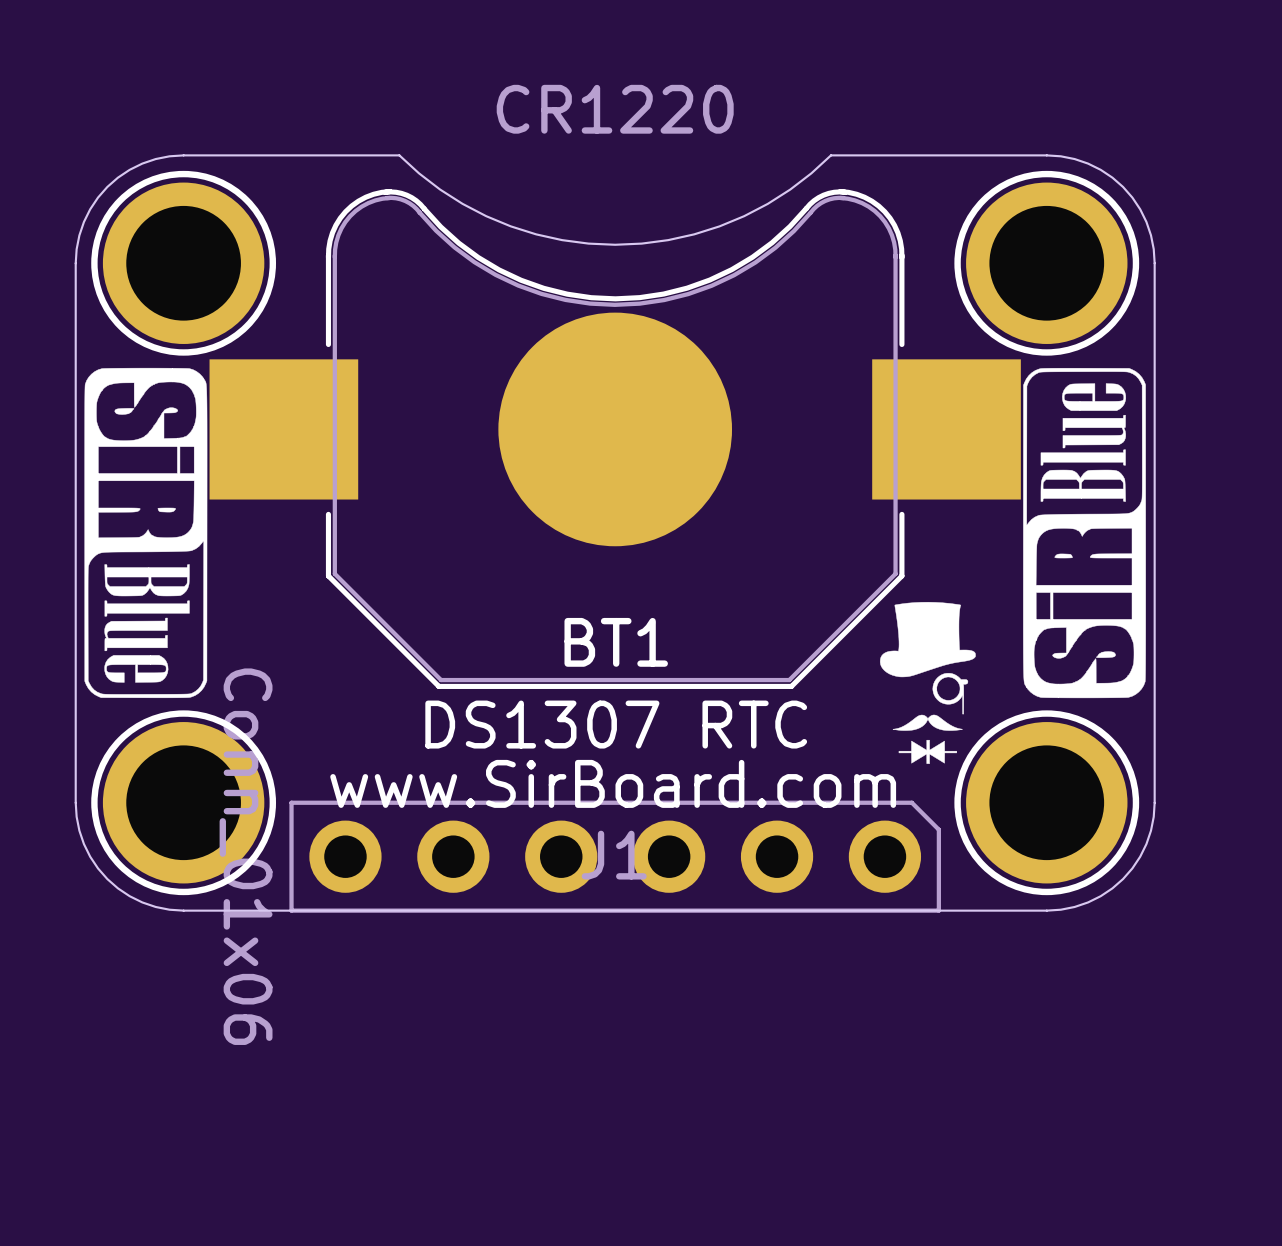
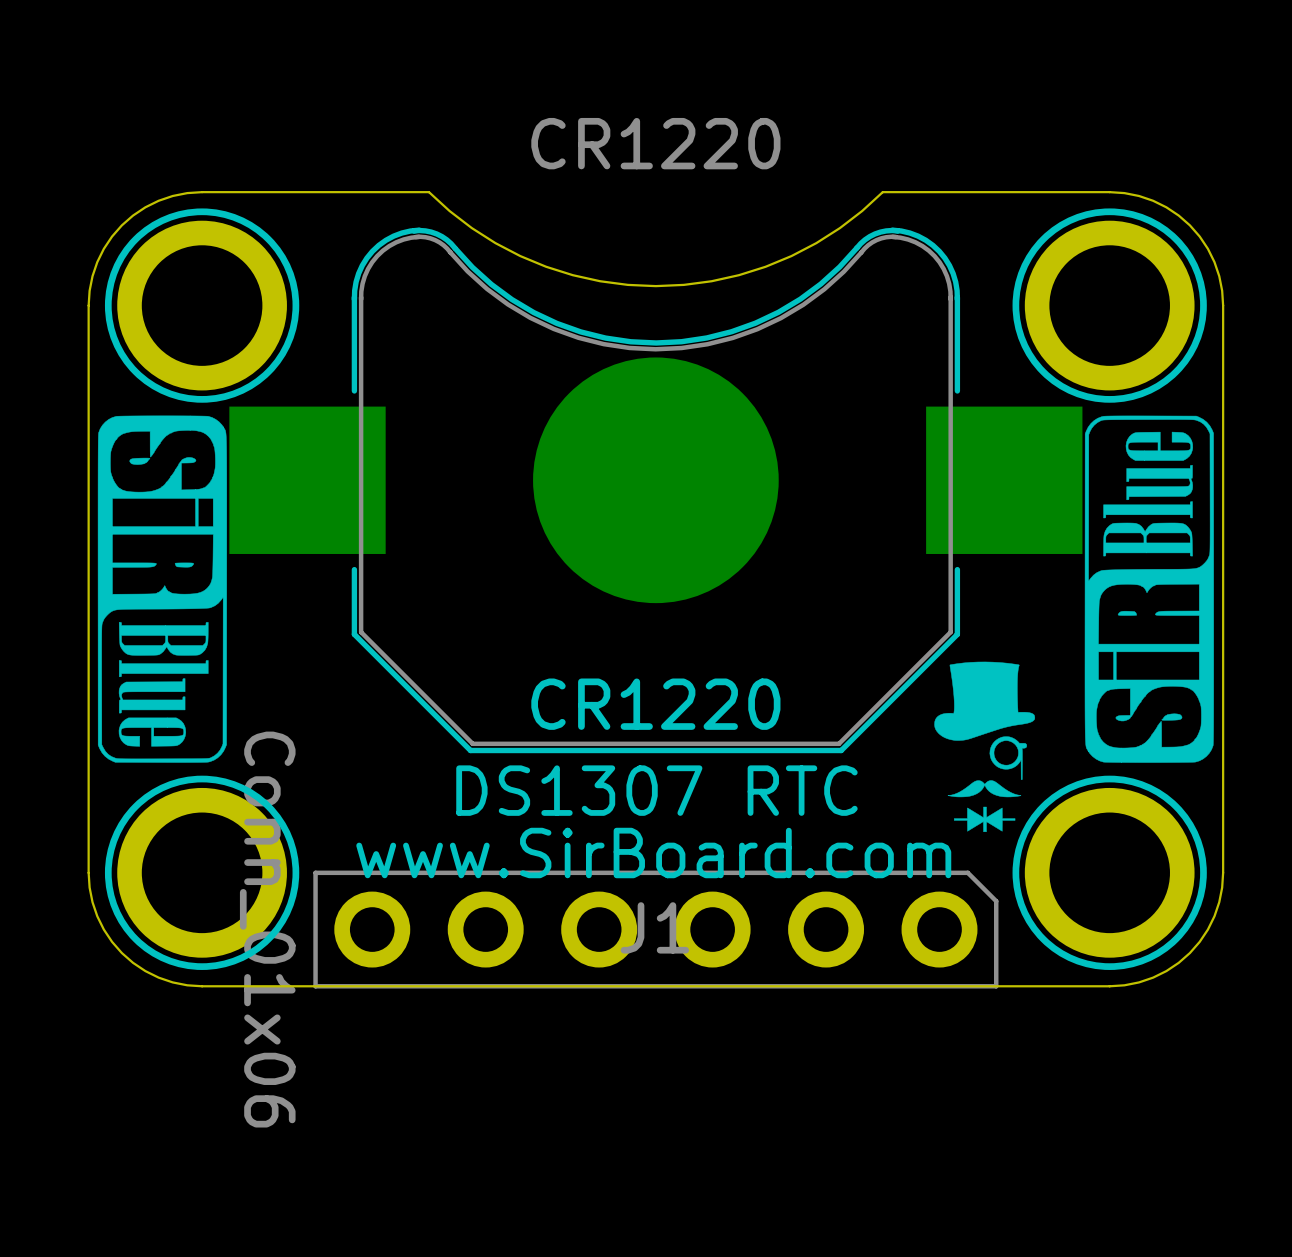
BT1 name: BT1 (616, 642) -> CR1220 (655, 704)

